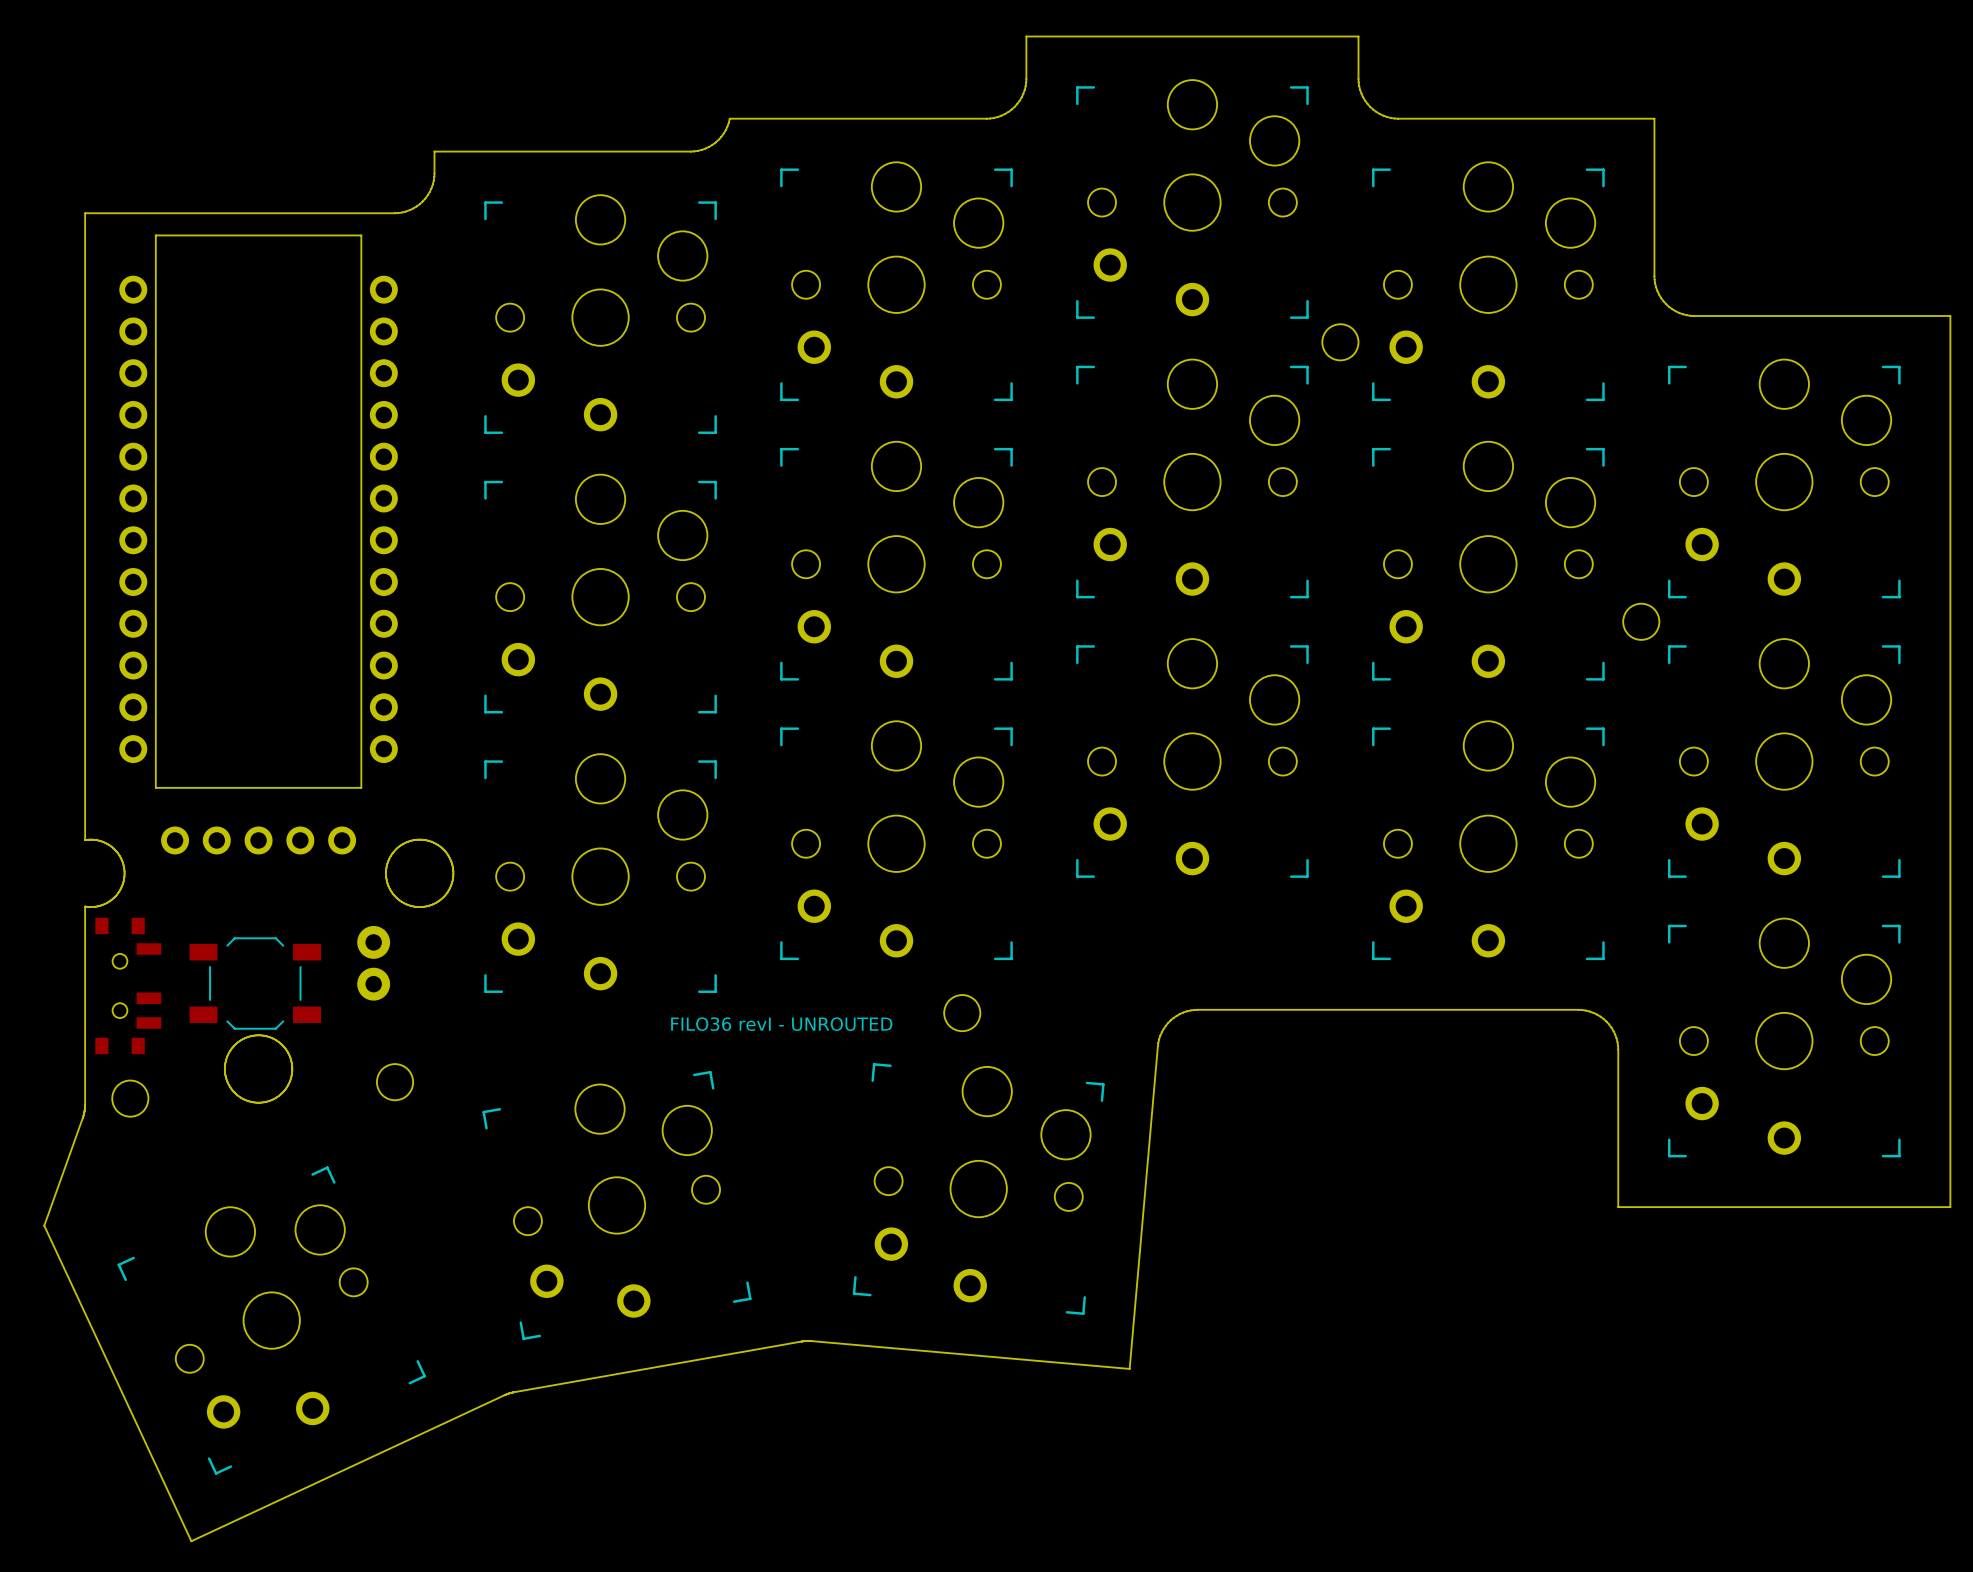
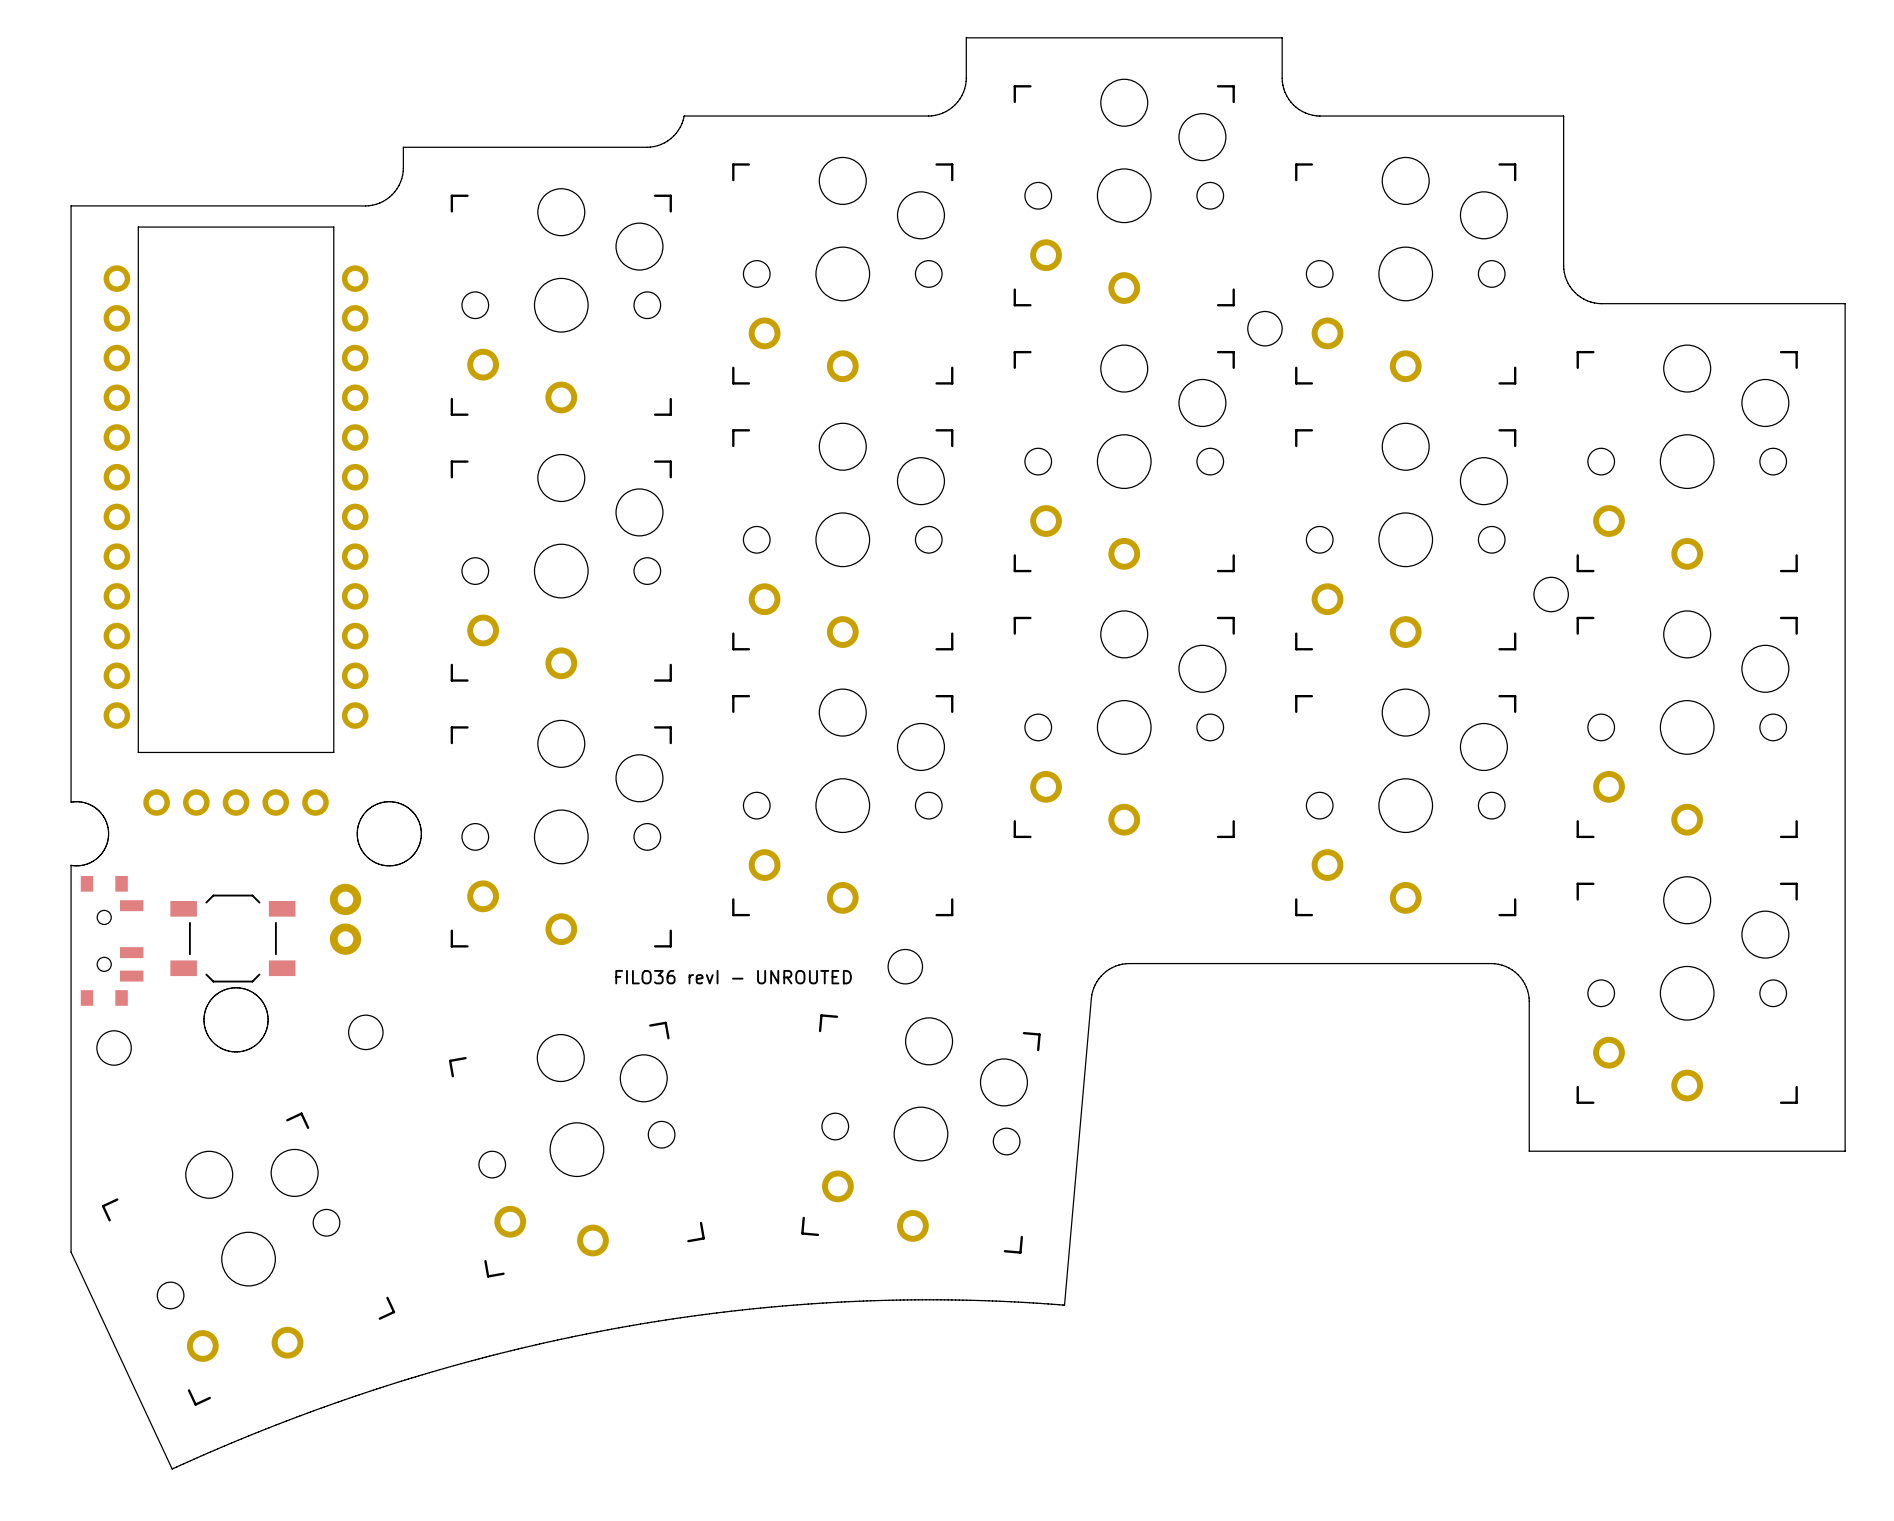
board edge: (85, 1104) (83, 1117) (44, 1225) (85, 1313) -> (71, 1053) (71, 1252)
board edge: (1129, 1368) (806, 1341) (514, 1392) (191, 1541) -> (1064, 1305) (951, 1299) (841, 1302) (727, 1311) (615, 1328) (503, 1352) (390, 1384) (279, 1423) (172, 1469)

